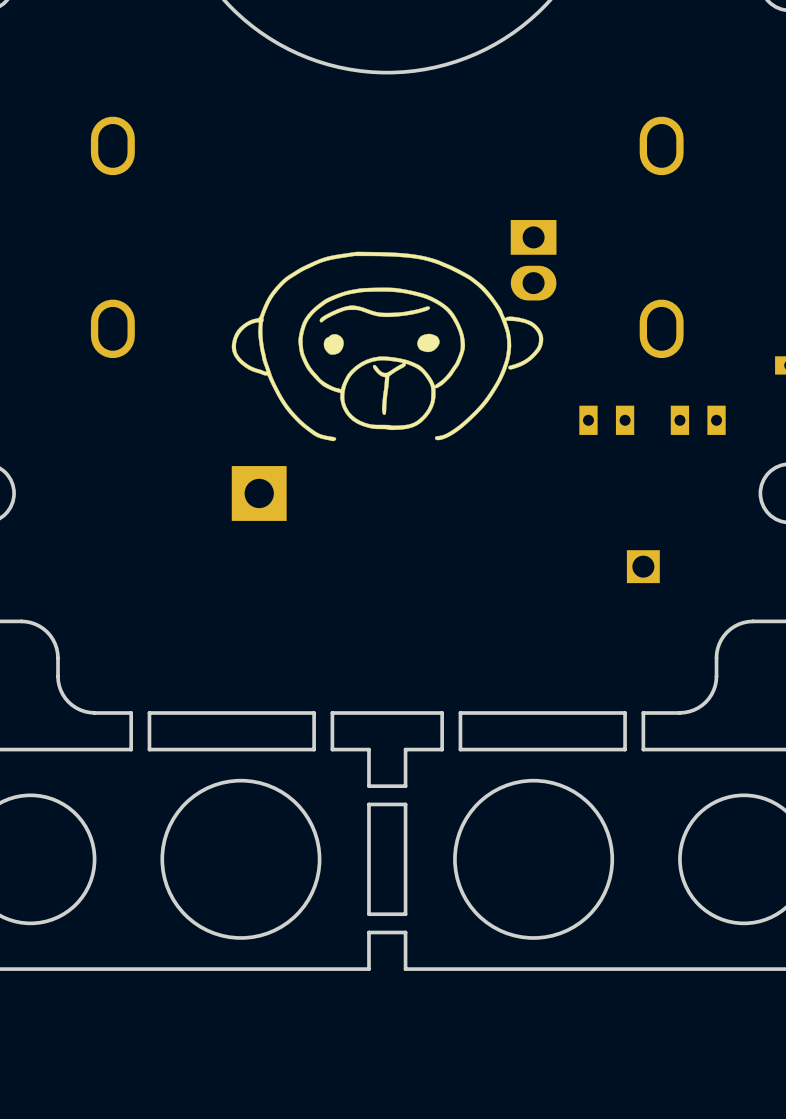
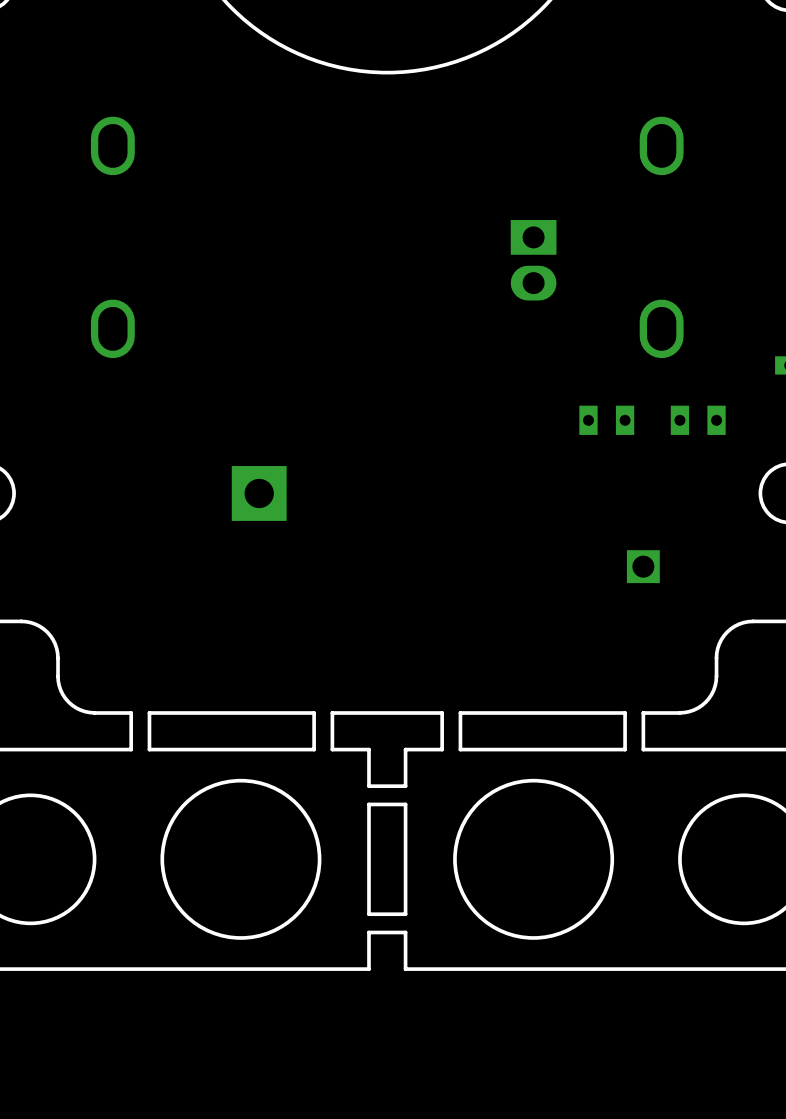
drawing: [231, 251, 544, 442] -> none

